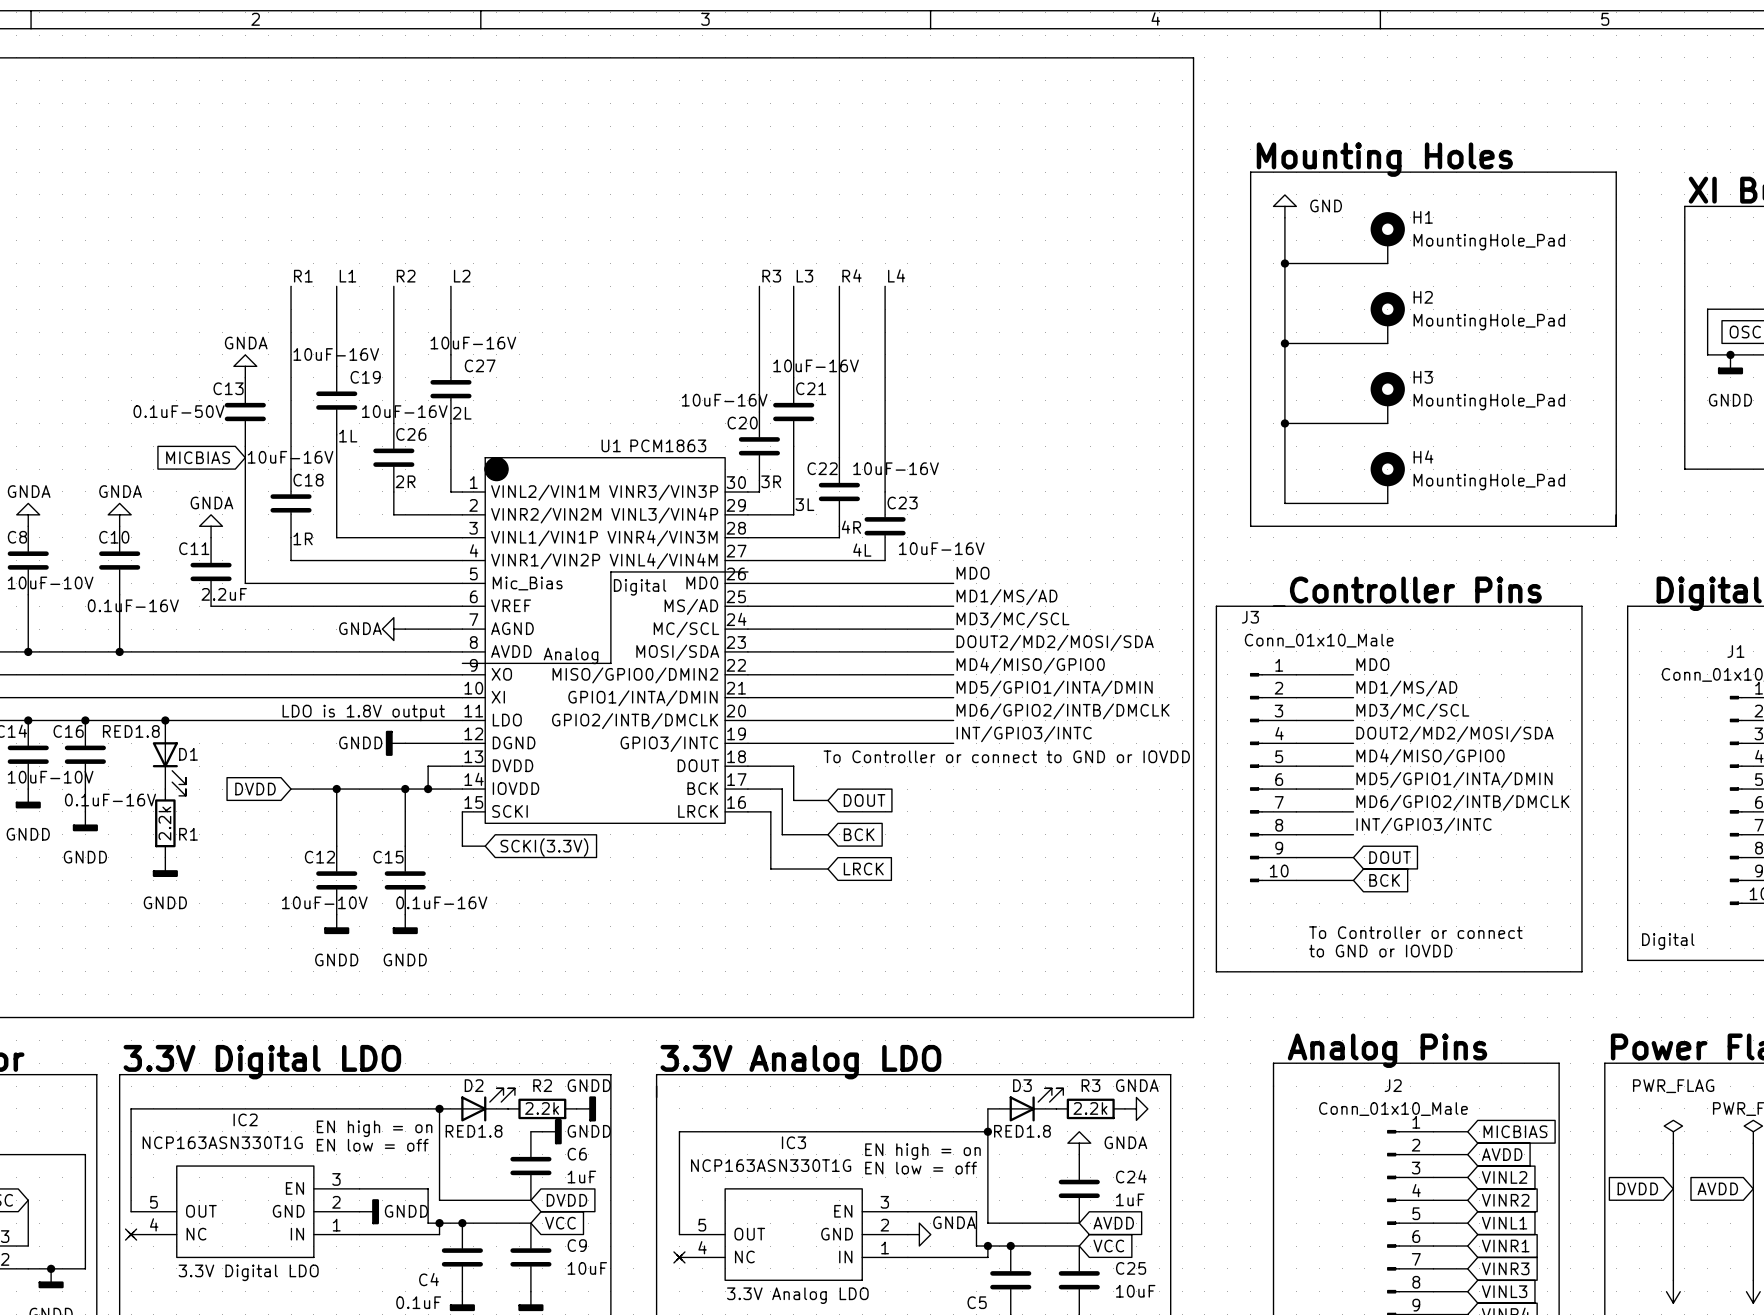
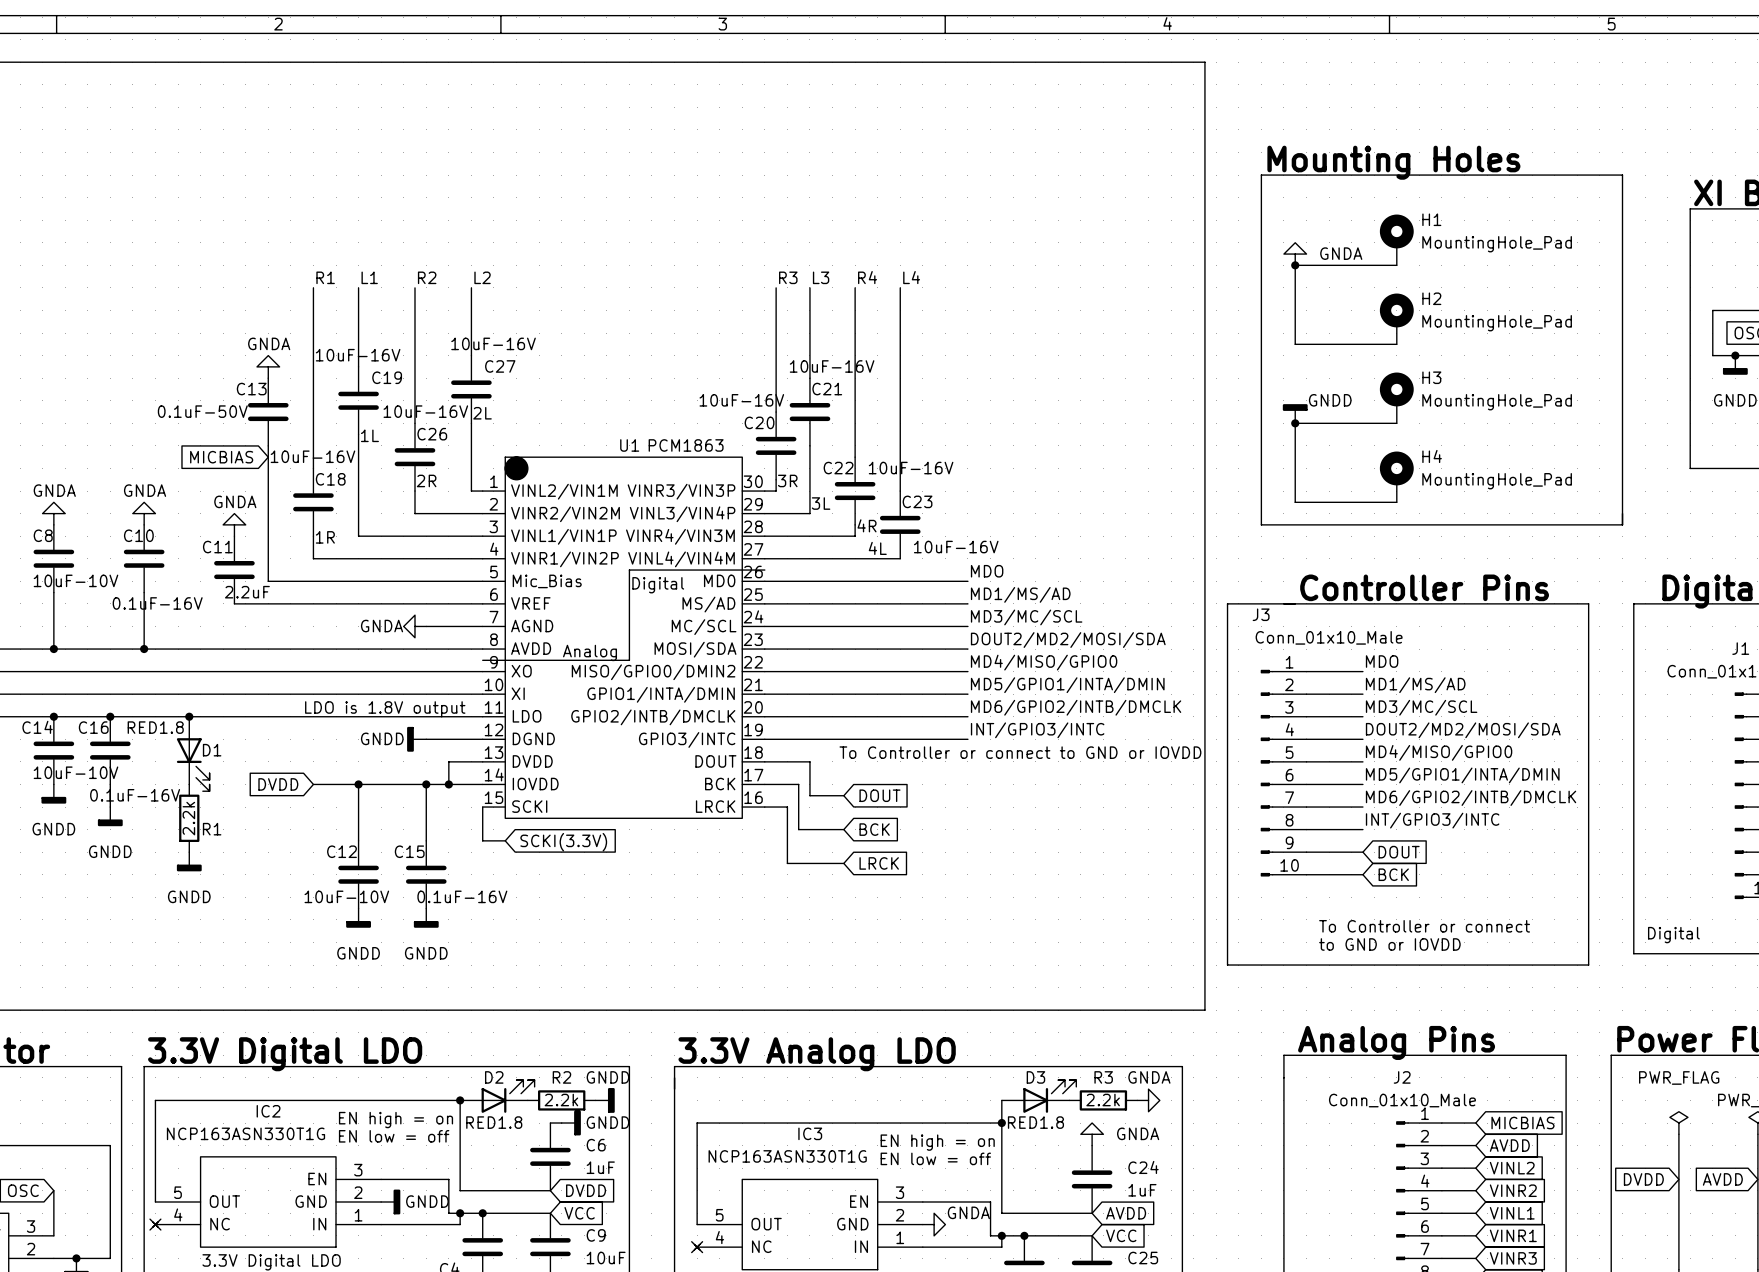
power symbol: GND (1284, 206) -> none
wire: (1284, 217) (1284, 263) -> none
power symbol: none -> GNDA (1295, 254)
wire: (1284, 343) (1284, 423) -> none
junction: (1284, 343) -> none
power symbol: none -> GNDD (1295, 413)

